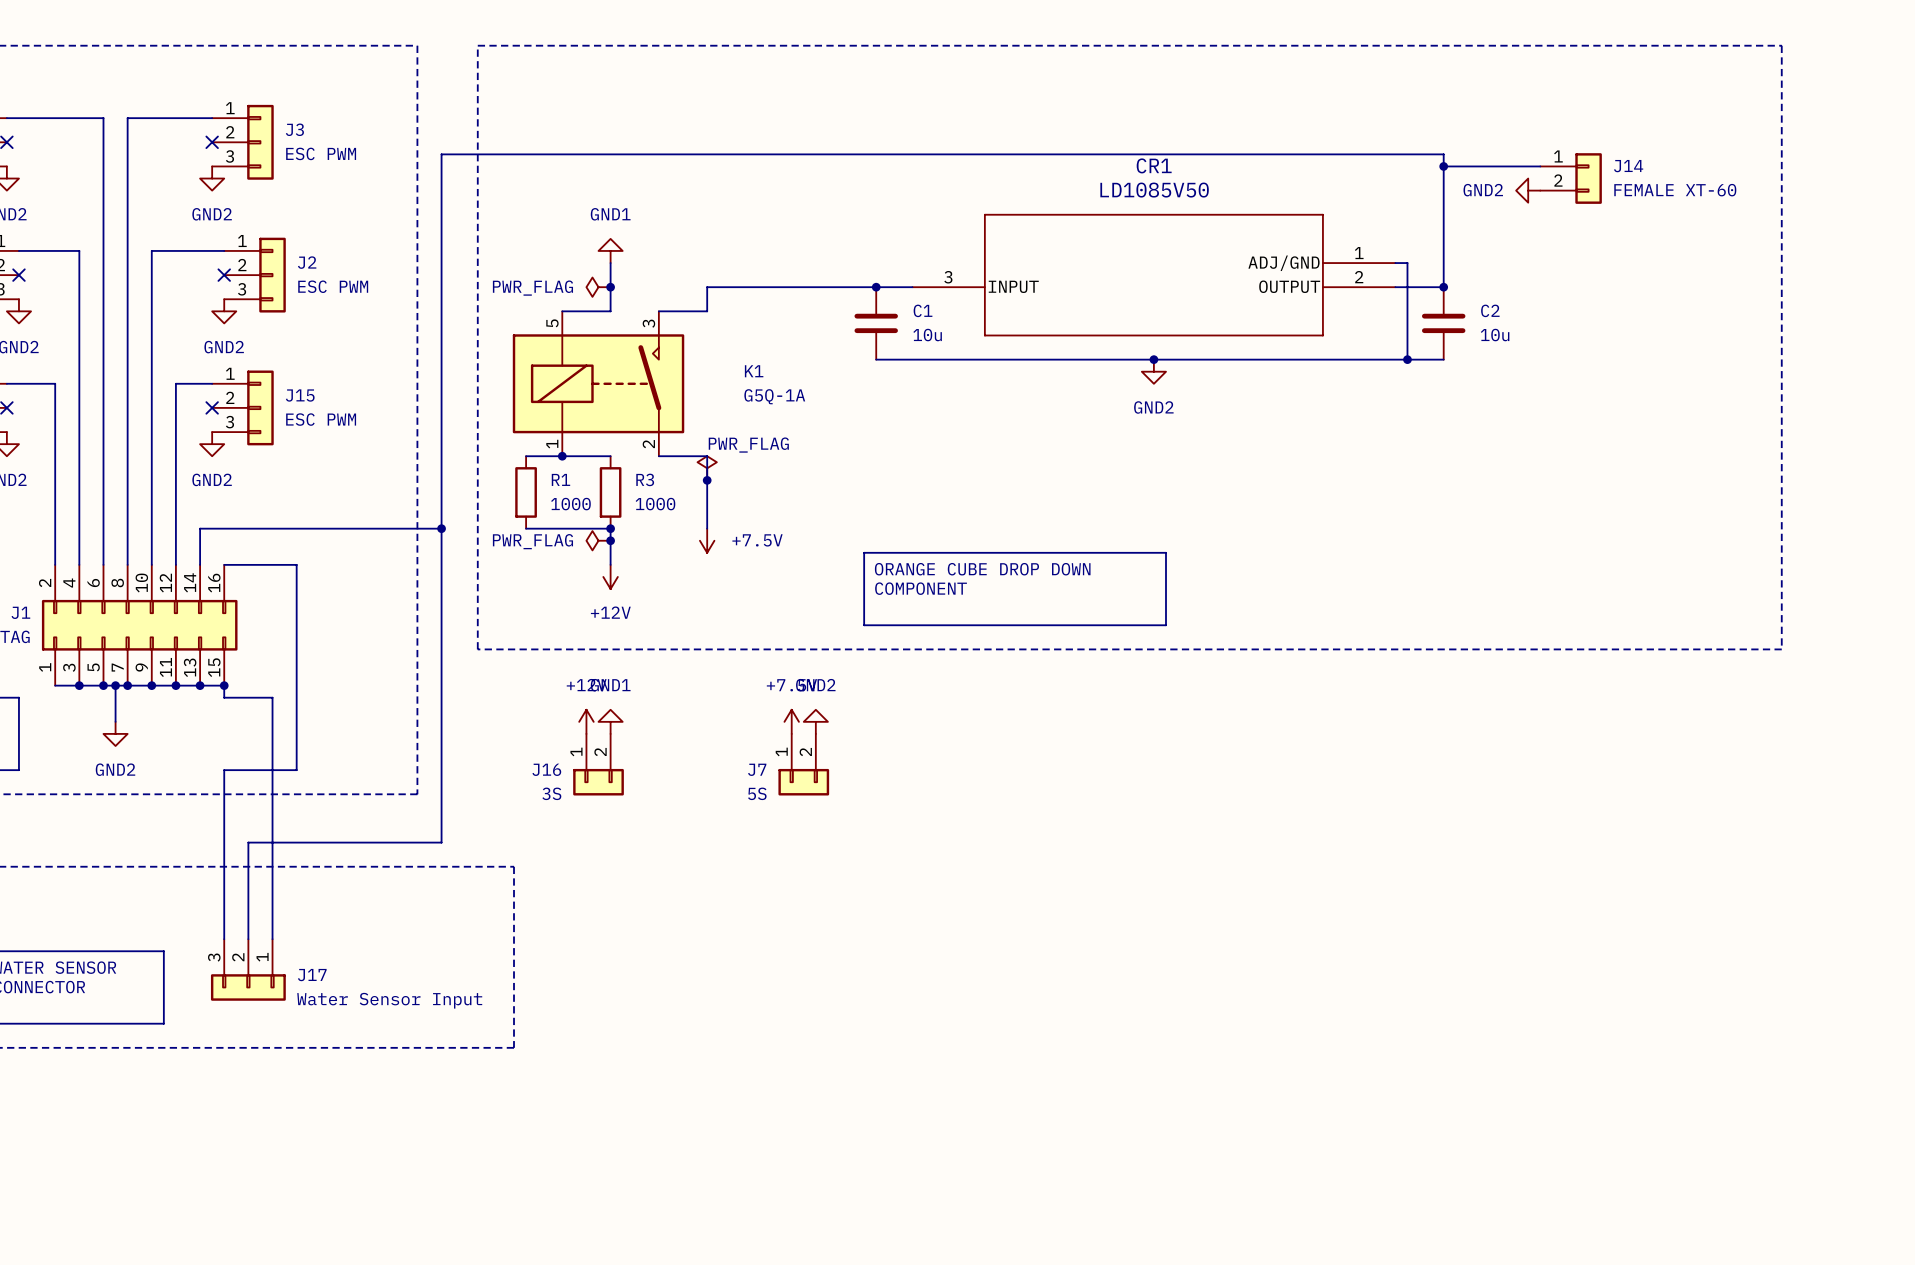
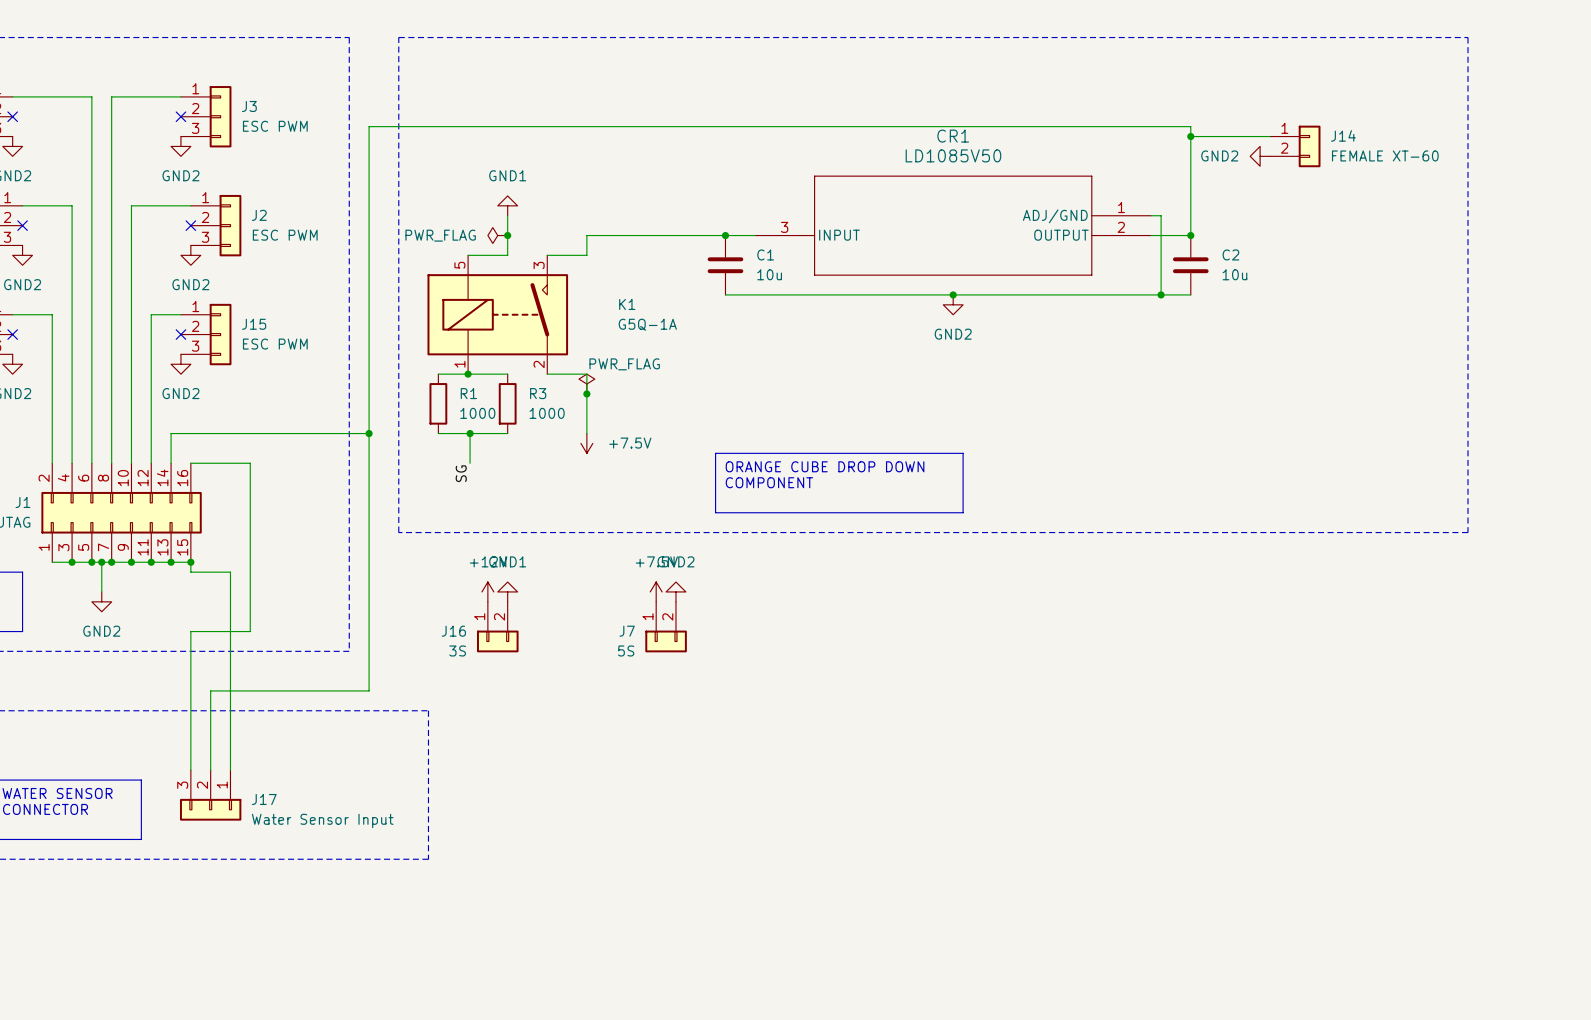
junction: none -> (470, 433)
wire: (610, 528) (610, 564) -> (470, 433) (470, 463)
junction: (610, 528) -> none
power symbol: PWR_FLAG (598, 540) -> none
junction: (610, 540) -> none
label: none -> SG (461, 473)
power symbol: +12V (610, 576) -> none

